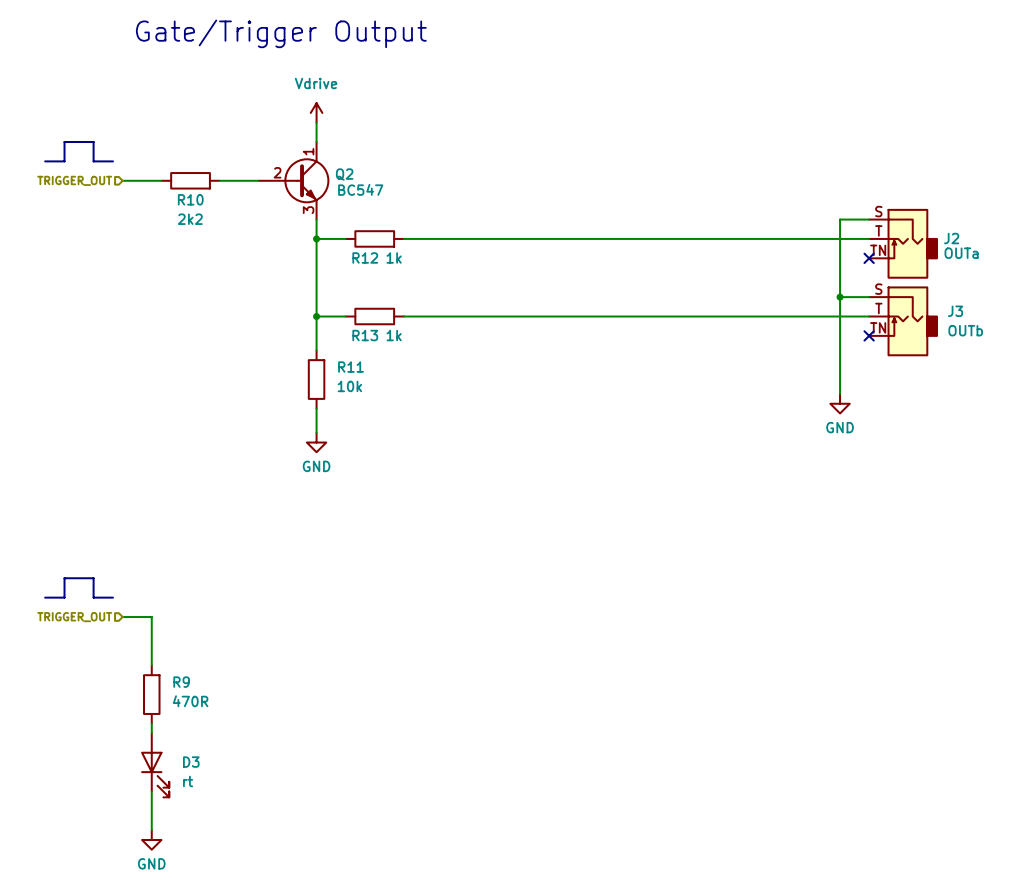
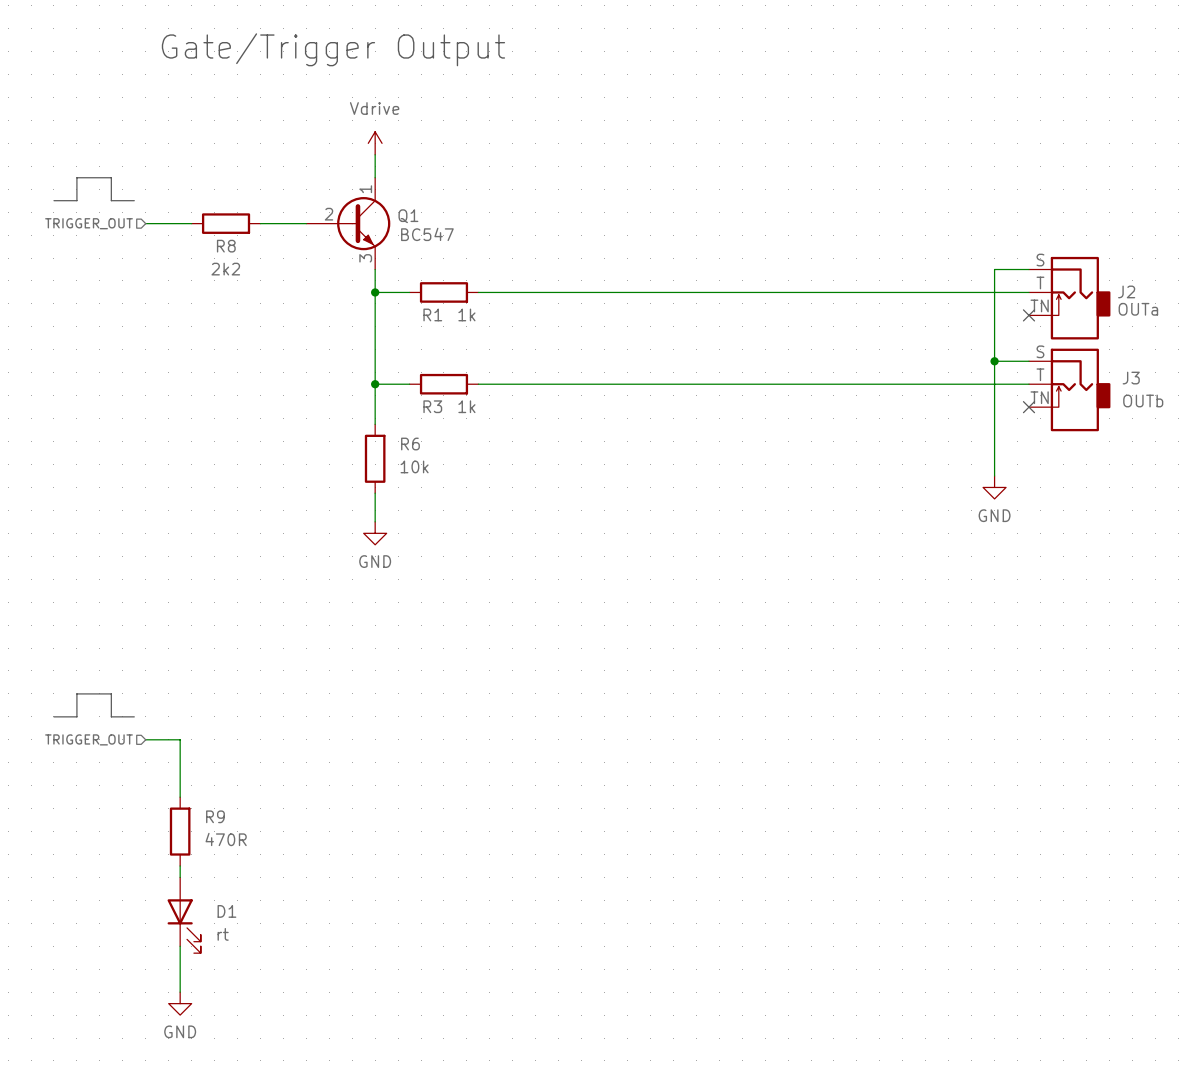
Q2 name: Q2 (344, 174) -> Q1 (408, 216)
R10 name: R10 (190, 199) -> R8 (226, 246)
R12 name: R12 (365, 257) -> R1 (432, 314)
R13 name: R13 (365, 335) -> R3 (432, 406)
R11 name: R11 (351, 367) -> R6 (410, 444)
D3 name: D3 (191, 762) -> D1 (226, 911)

